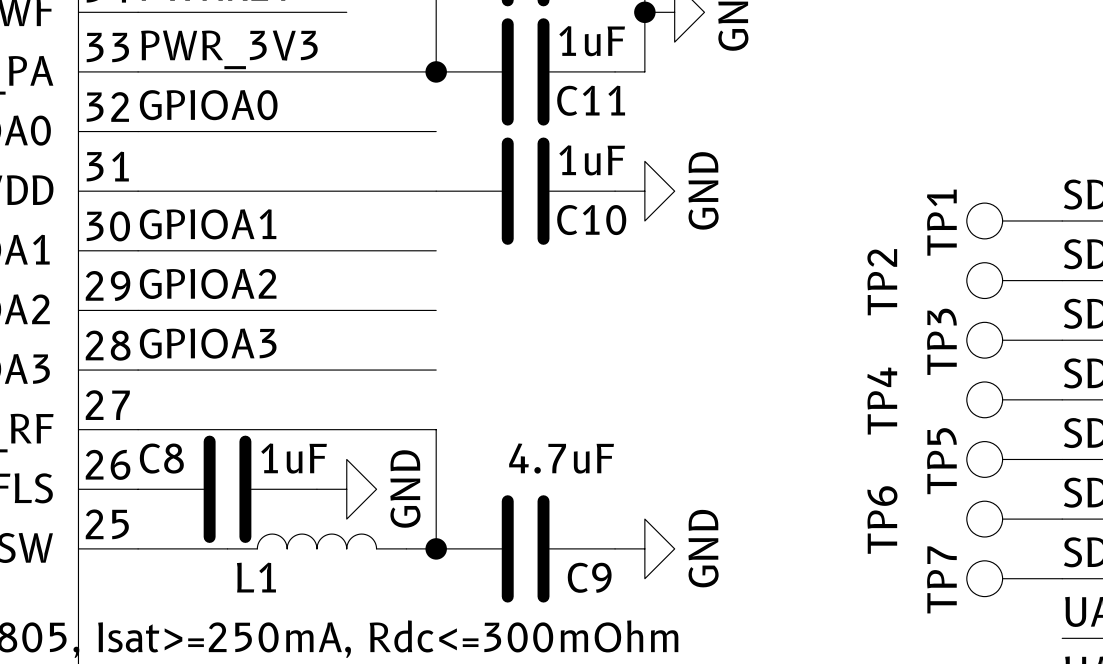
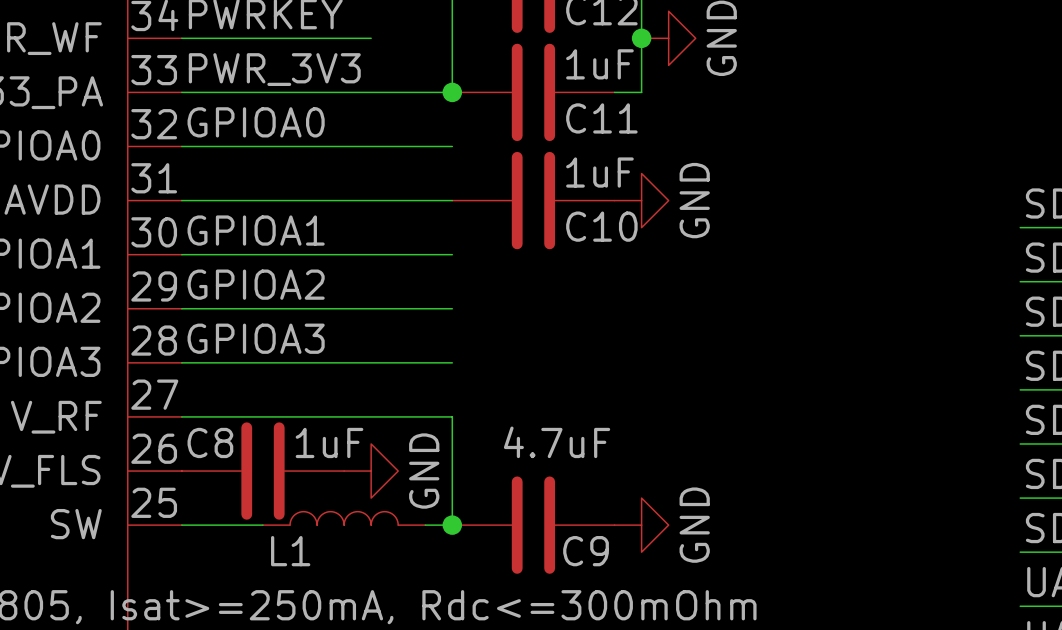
TP1: (1014, 220) -> none
TP2: (1014, 280) -> none
TP3: (1014, 340) -> none
TP4: (1014, 399) -> none
TP5: (1014, 459) -> none
TP6: (1014, 519) -> none
TP7: (1014, 578) -> none

